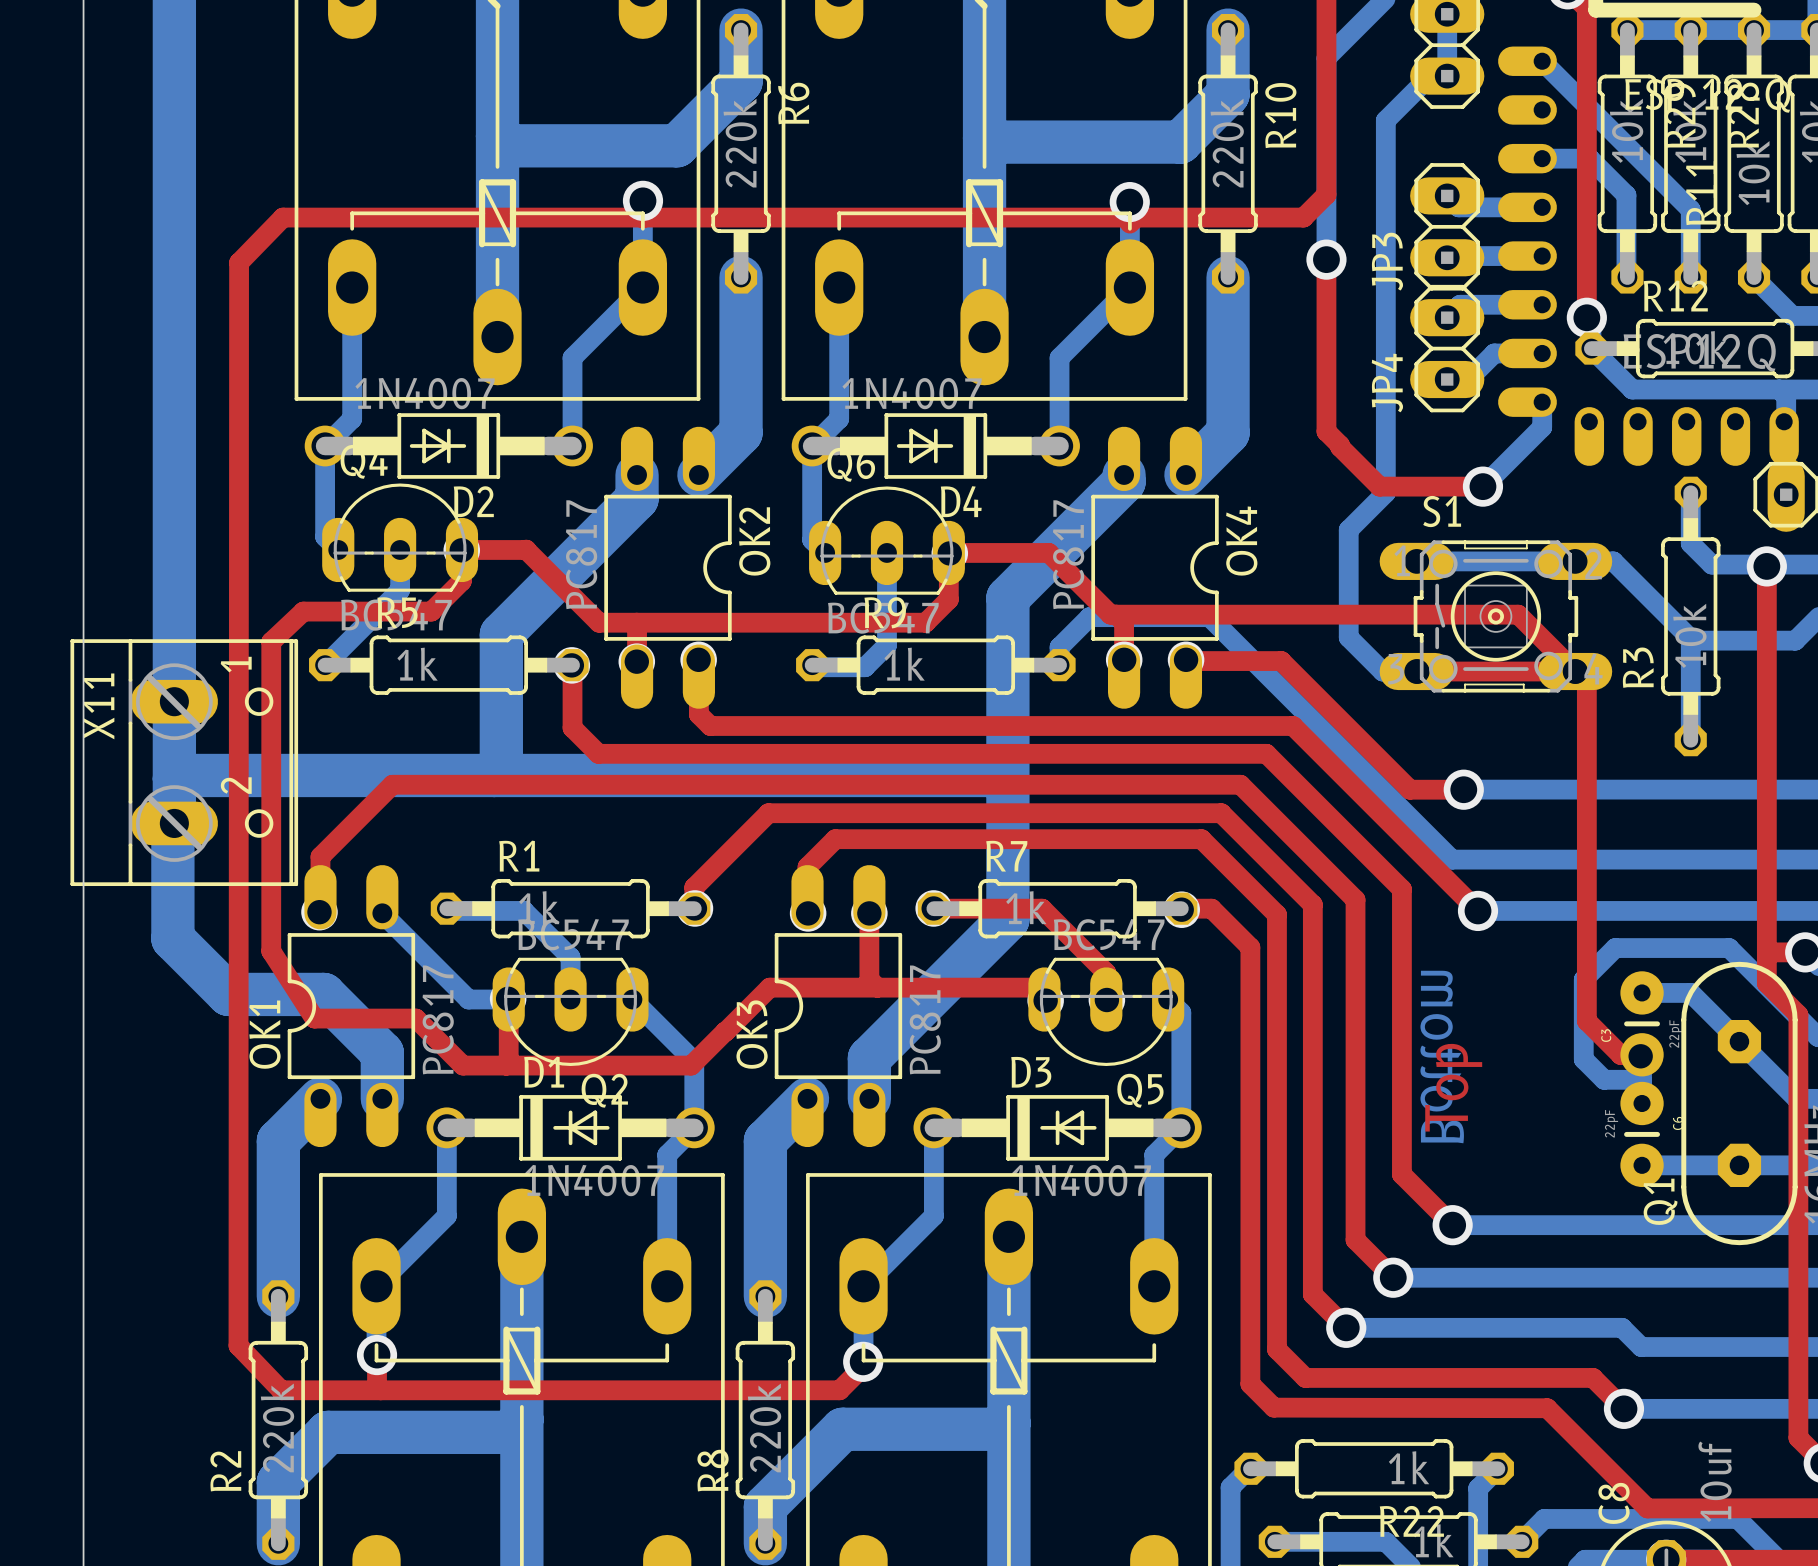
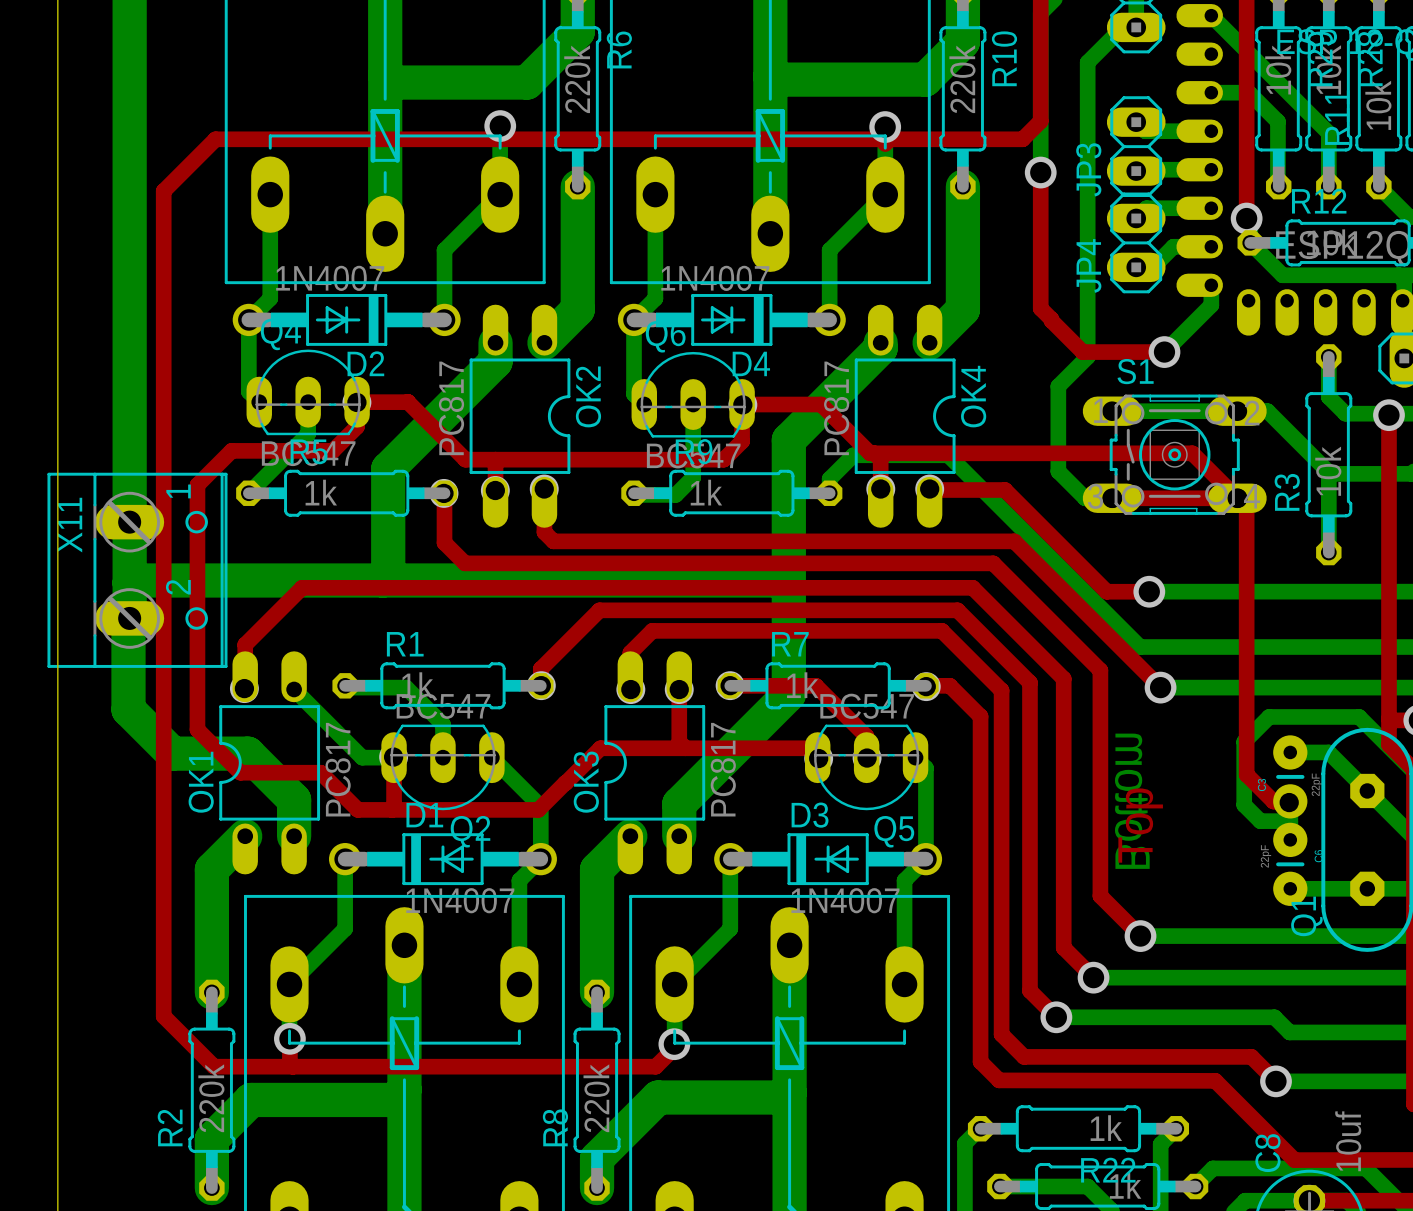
top track: (283, 217) (239, 262) (238, 1345) (281, 1390) -> (215, 139) (163, 191) (163, 1016) (214, 1066)
top track: (303, 611) (271, 641) (271, 951) (314, 1018) -> (231, 450) (197, 485) (197, 729) (240, 772)

